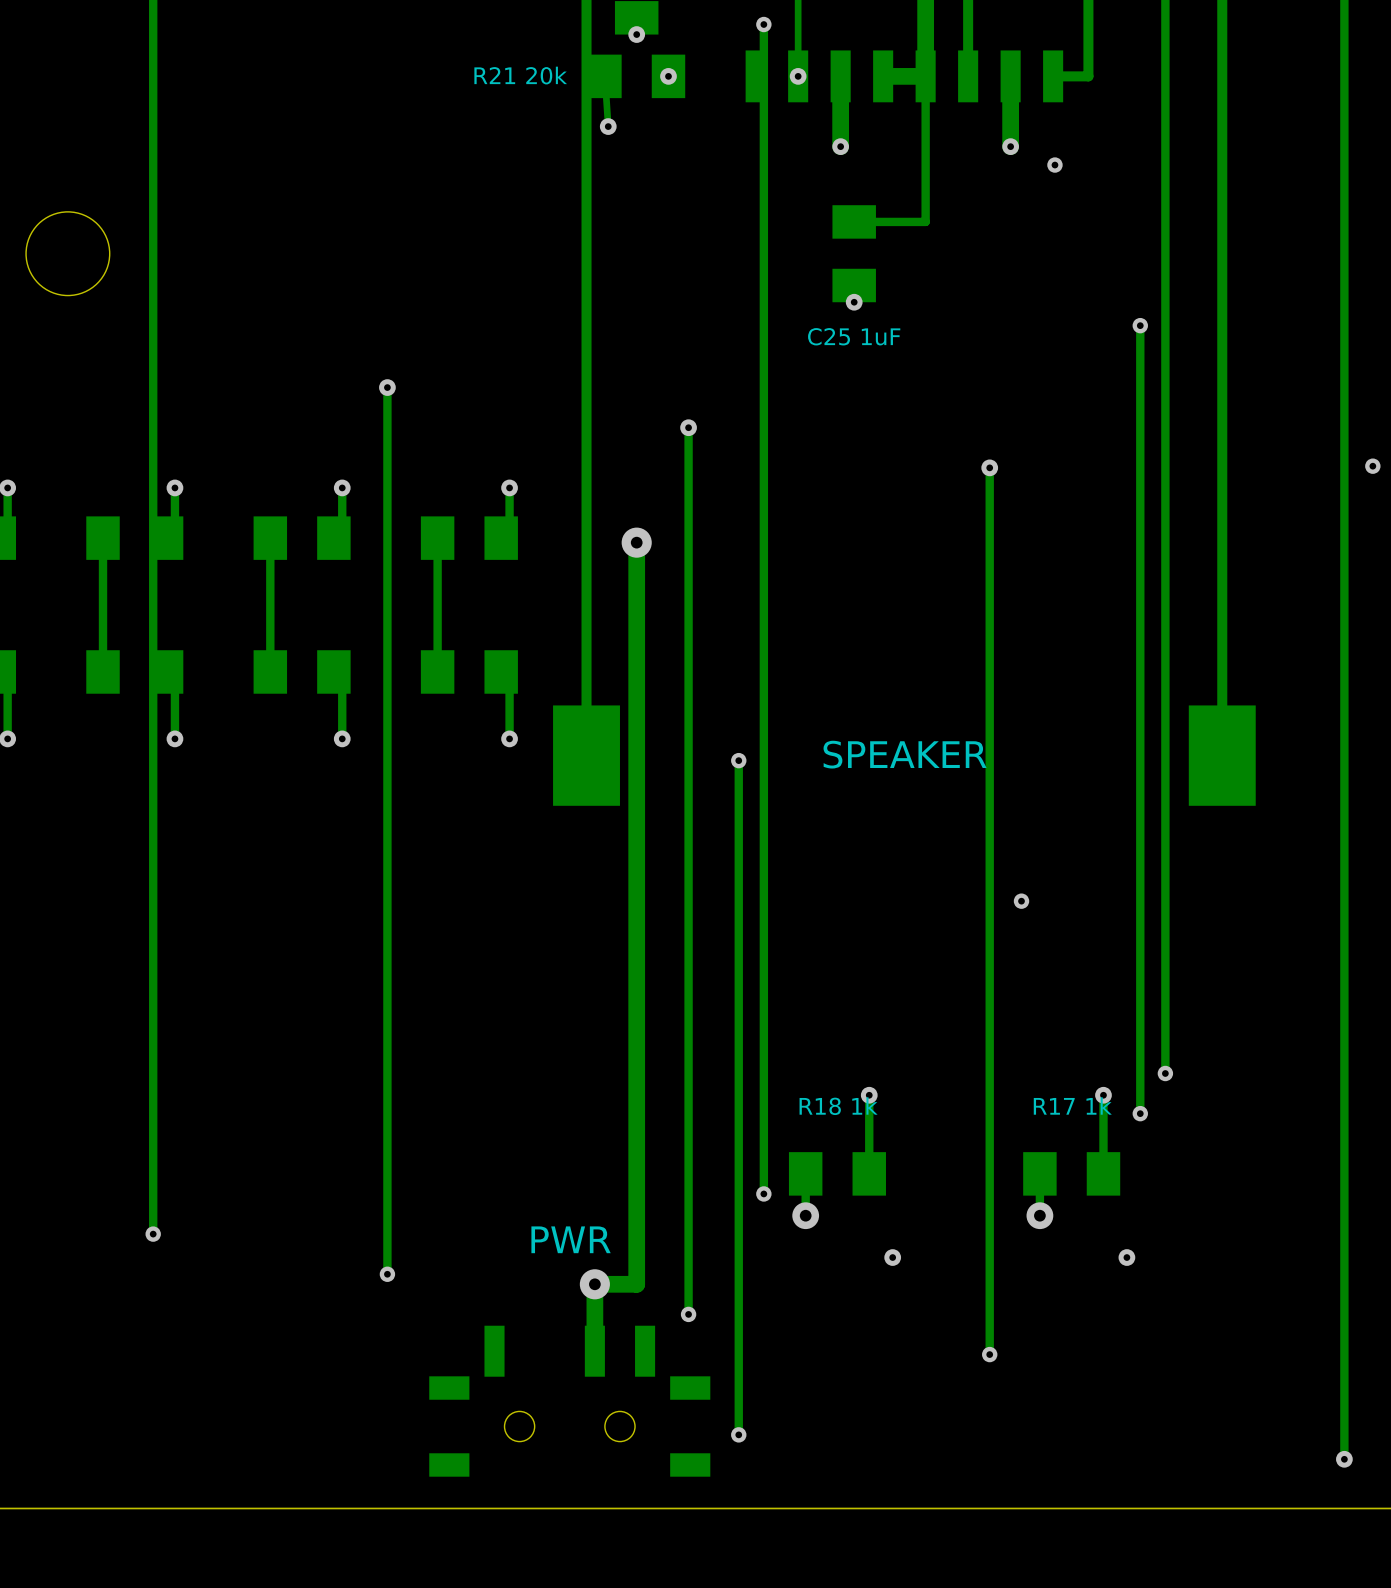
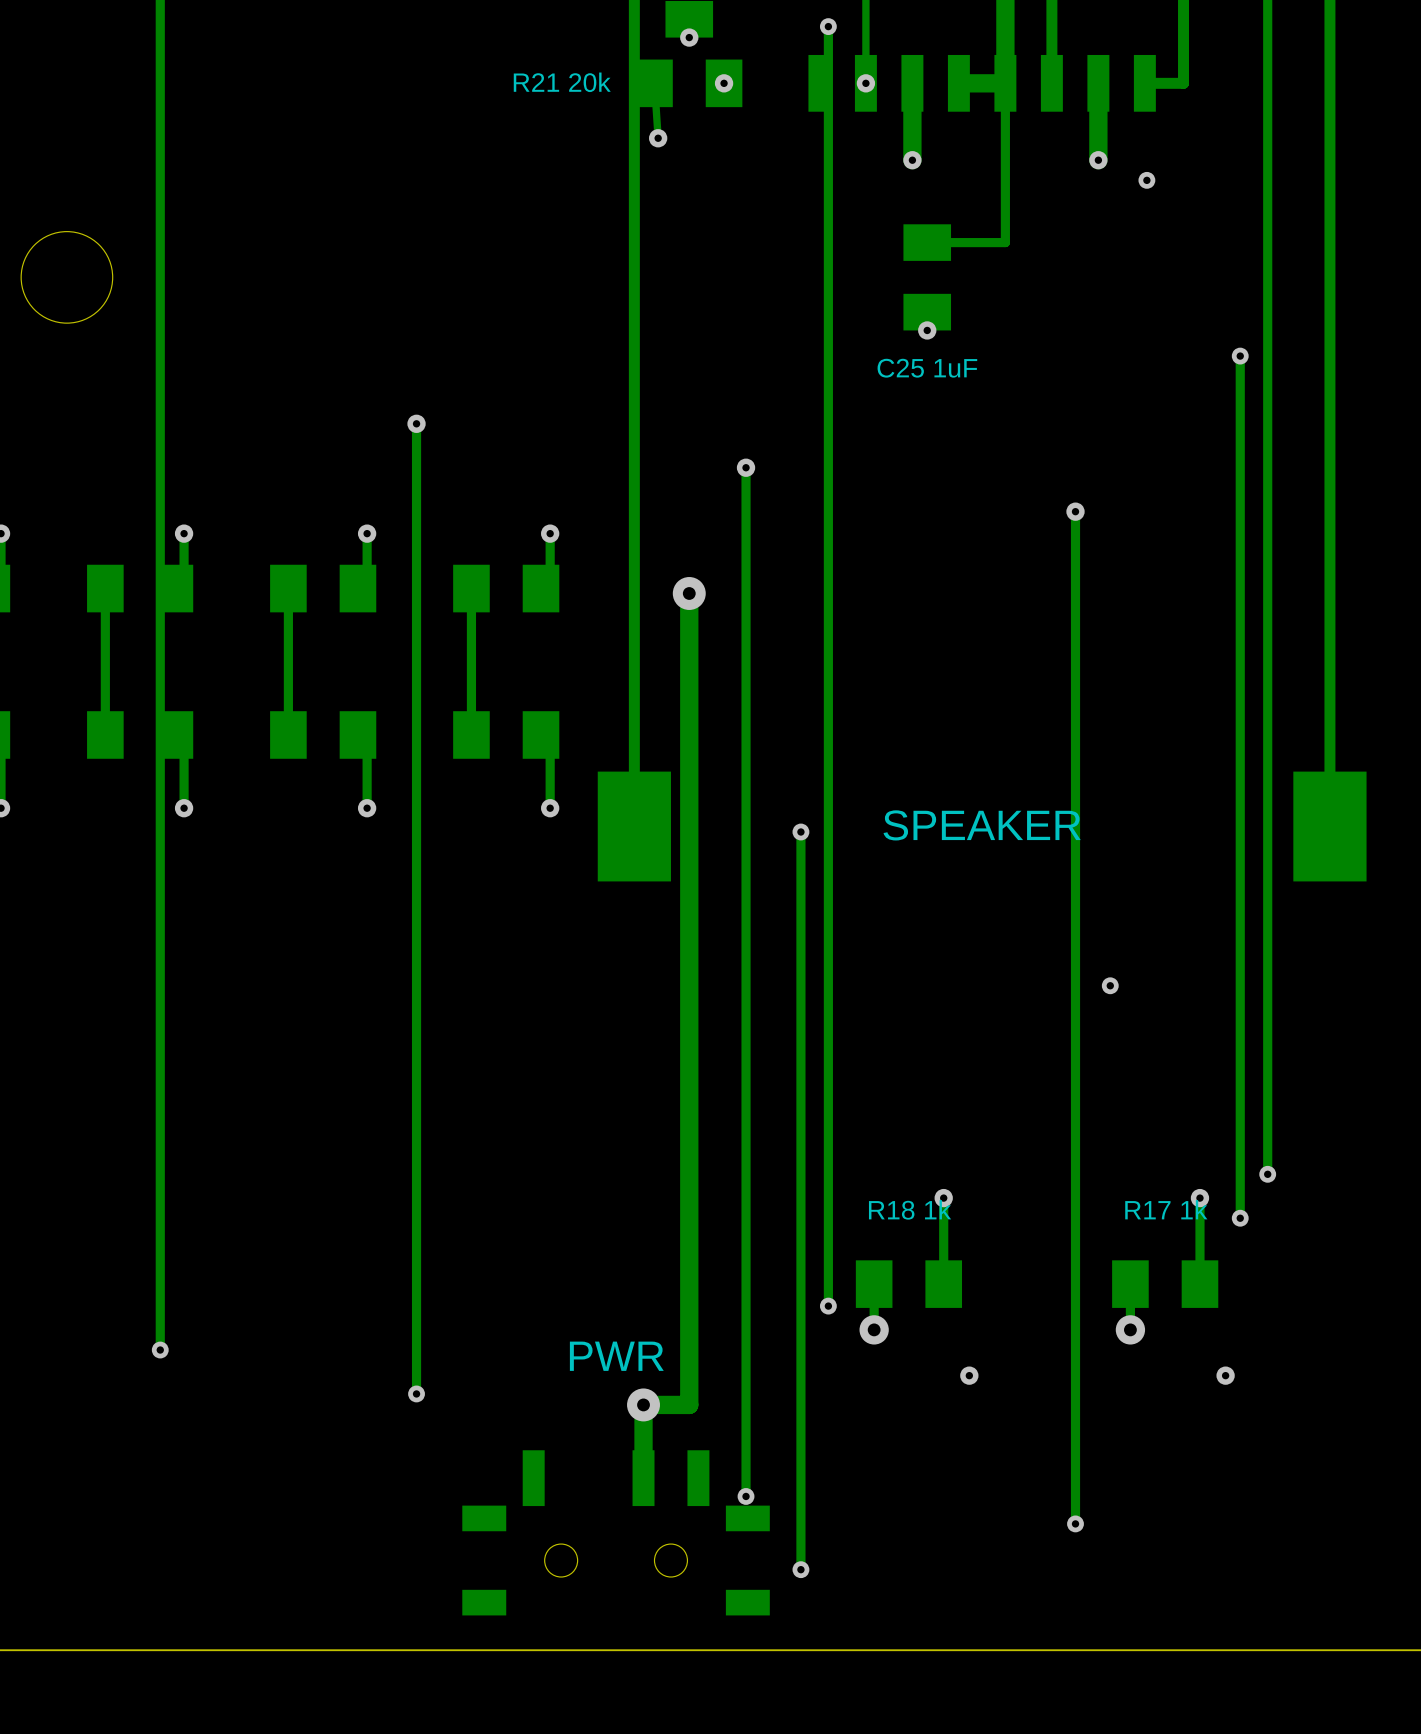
track: none -> (746, 1437) (746, 1496)
via position: (688, 1314) -> (746, 1496)
track: none -> (1075, 1481) (1075, 1523)
via position: (989, 1354) -> (1075, 1523)

